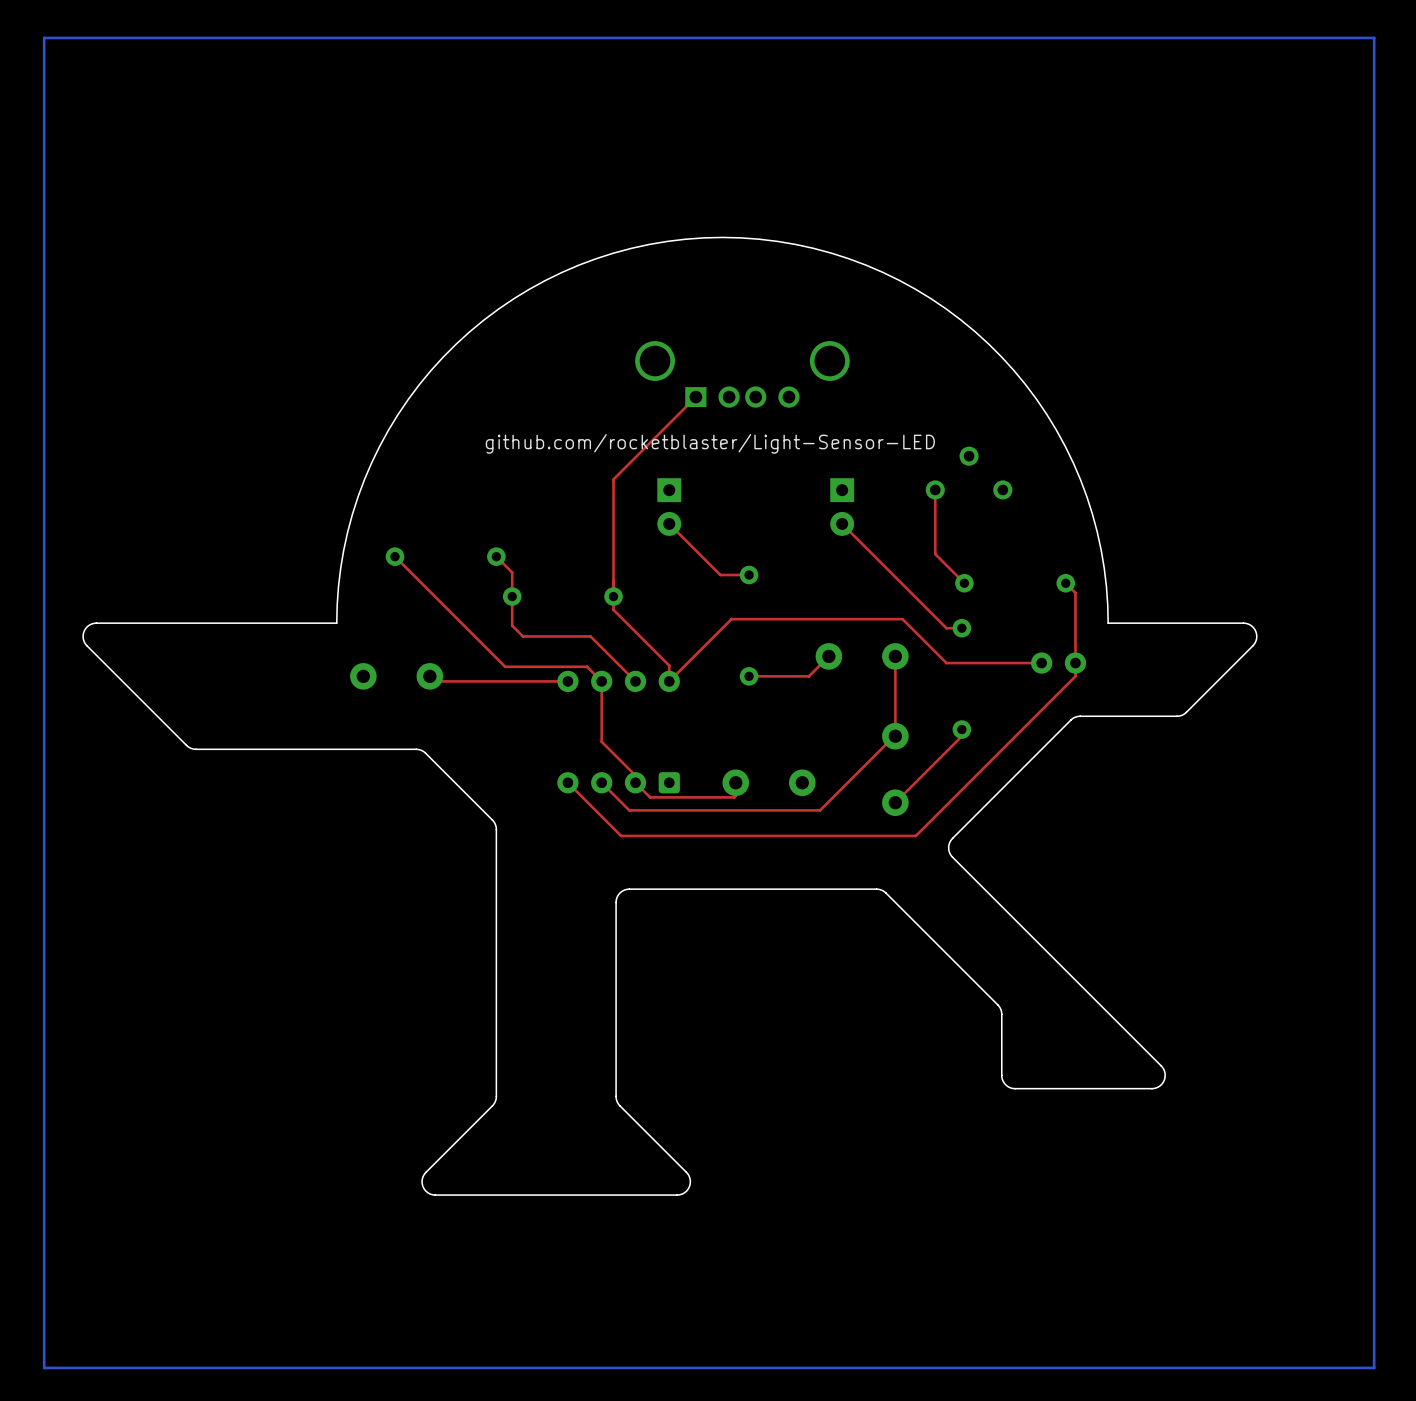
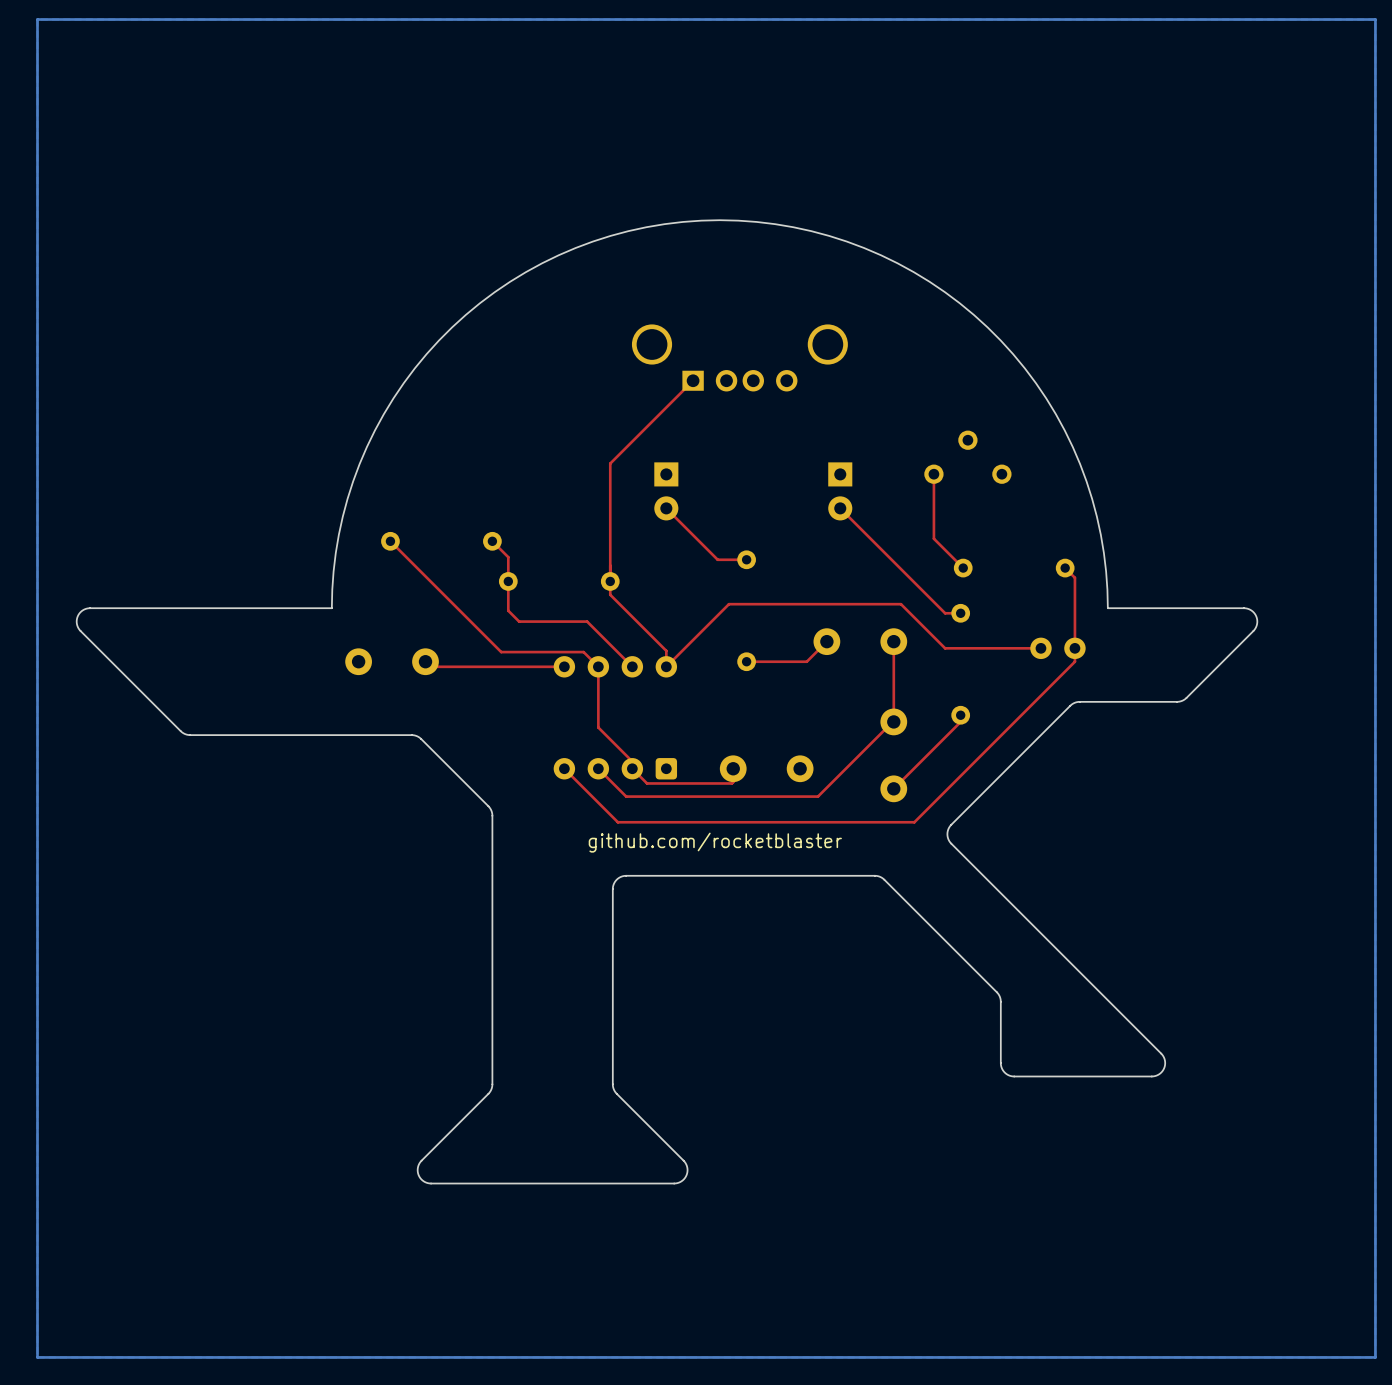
text: github.com/rocketblaster/Light-Sensor-LED (710, 443) -> none
text: none -> github.com/rocketblaster (715, 842)

